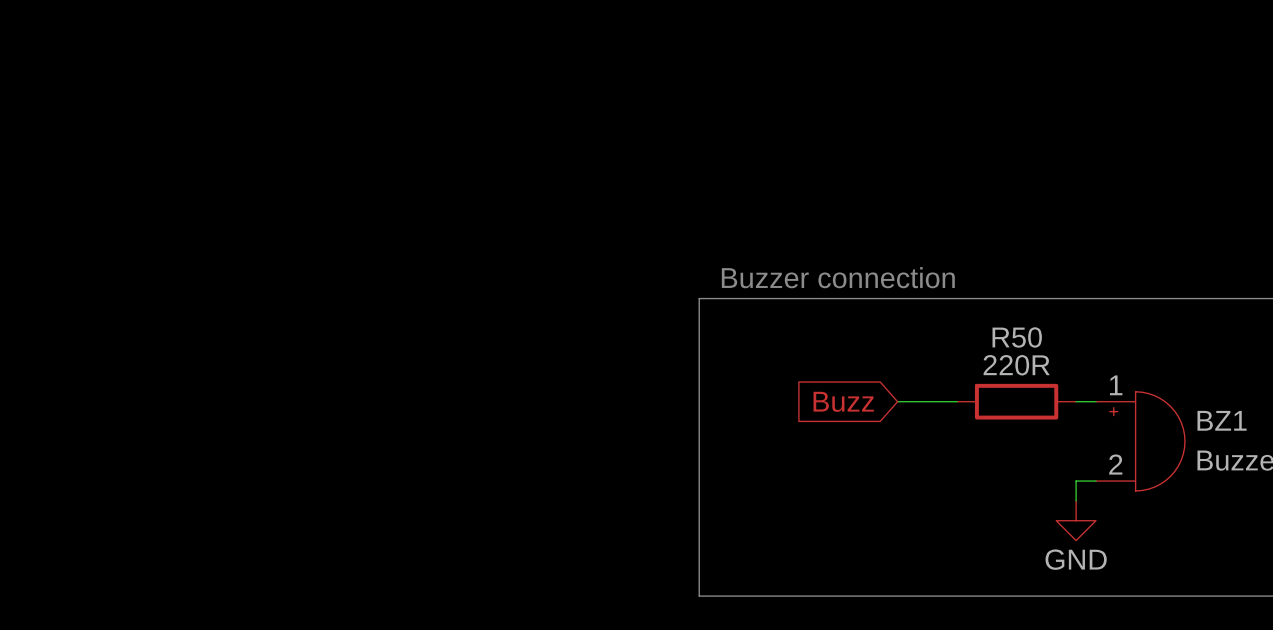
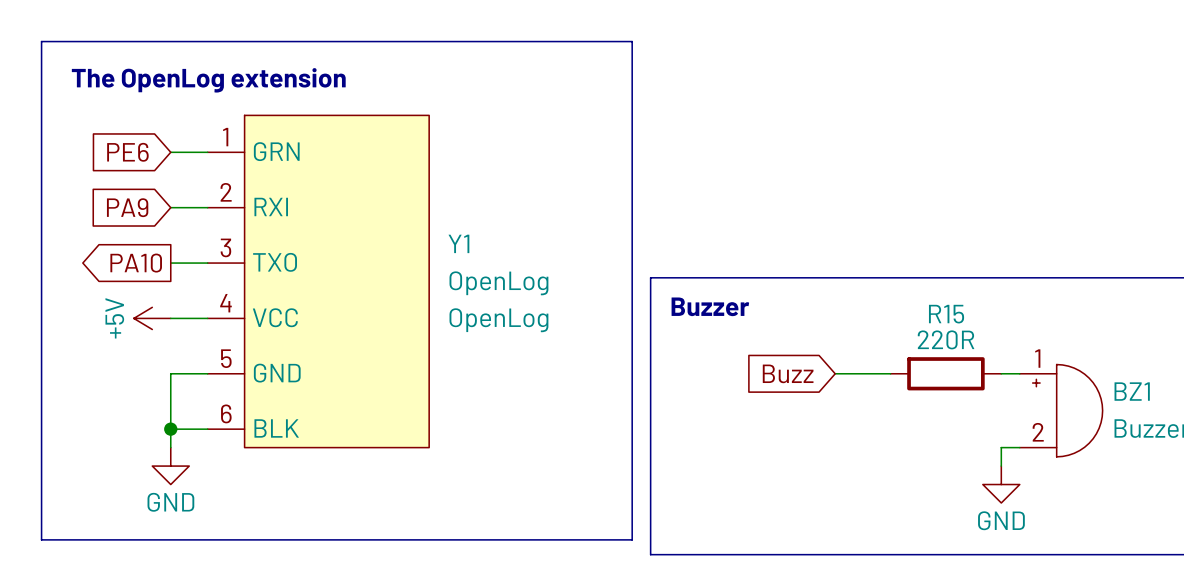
line: none -> (41, 41) (632, 41) (632, 539) (41, 539) (41, 41)
text: none -> The OpenLog extension (208, 80)
global label: none -> PE6 (127, 152)
wire: none -> (170, 152) (207, 152)
global label: none -> PA9 (127, 207)
wire: none -> (170, 207) (207, 207)
text: Buzzer connection (838, 277) -> none
global label: none -> PA10 (136, 263)
wire: none -> (170, 263) (207, 263)
Y1: none -> OpenLog (318, 281)
text: none -> Buzzer (710, 306)
R50 name: R50 (1017, 337) -> R15 (946, 314)
power symbol: none -> +5V (152, 318)
wire: none -> (170, 318) (207, 318)
wire: none -> (207, 373) (170, 373) (170, 447)
wire: none -> (170, 429) (207, 429)
junction: none -> (170, 429)
power symbol: none -> GND (170, 466)

